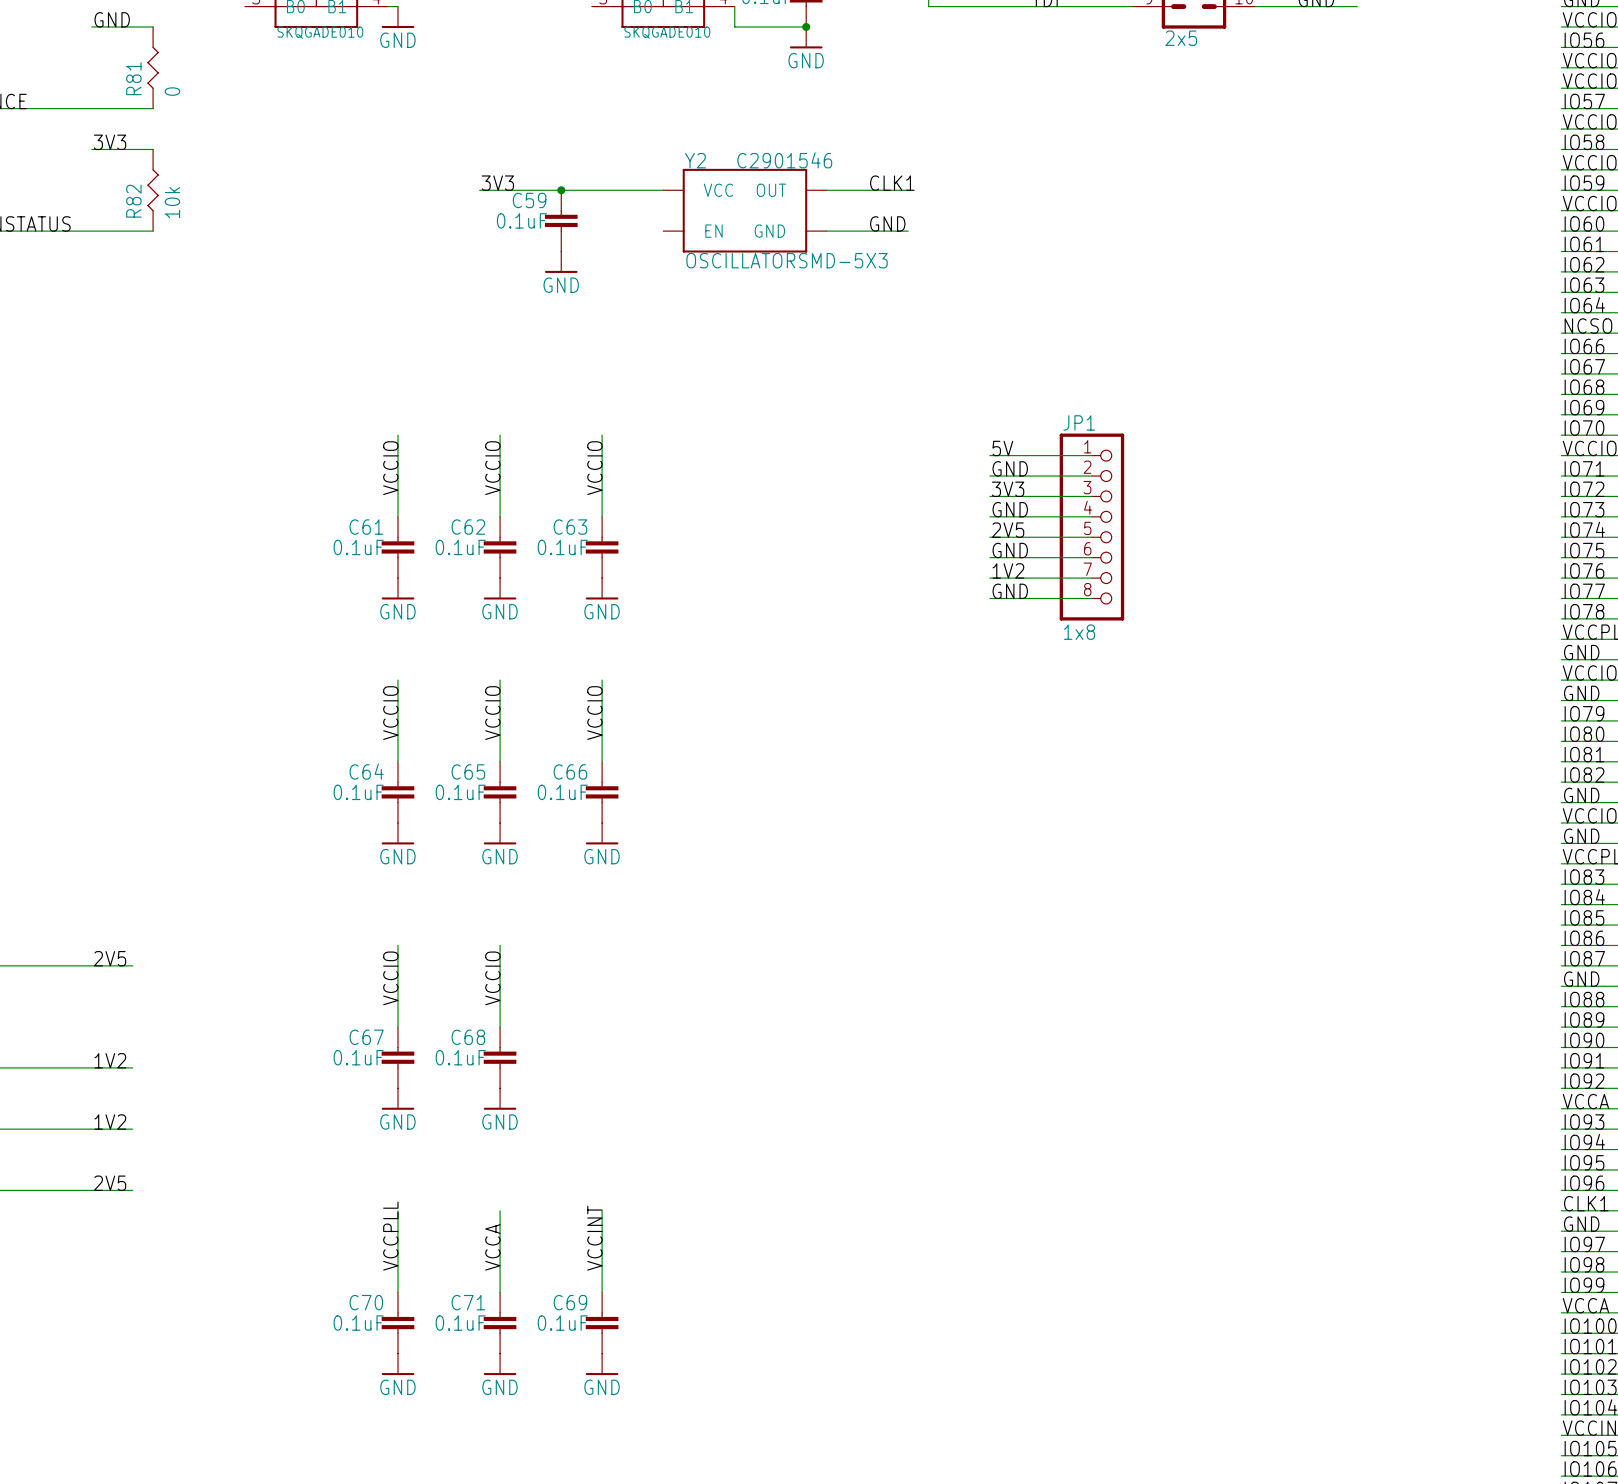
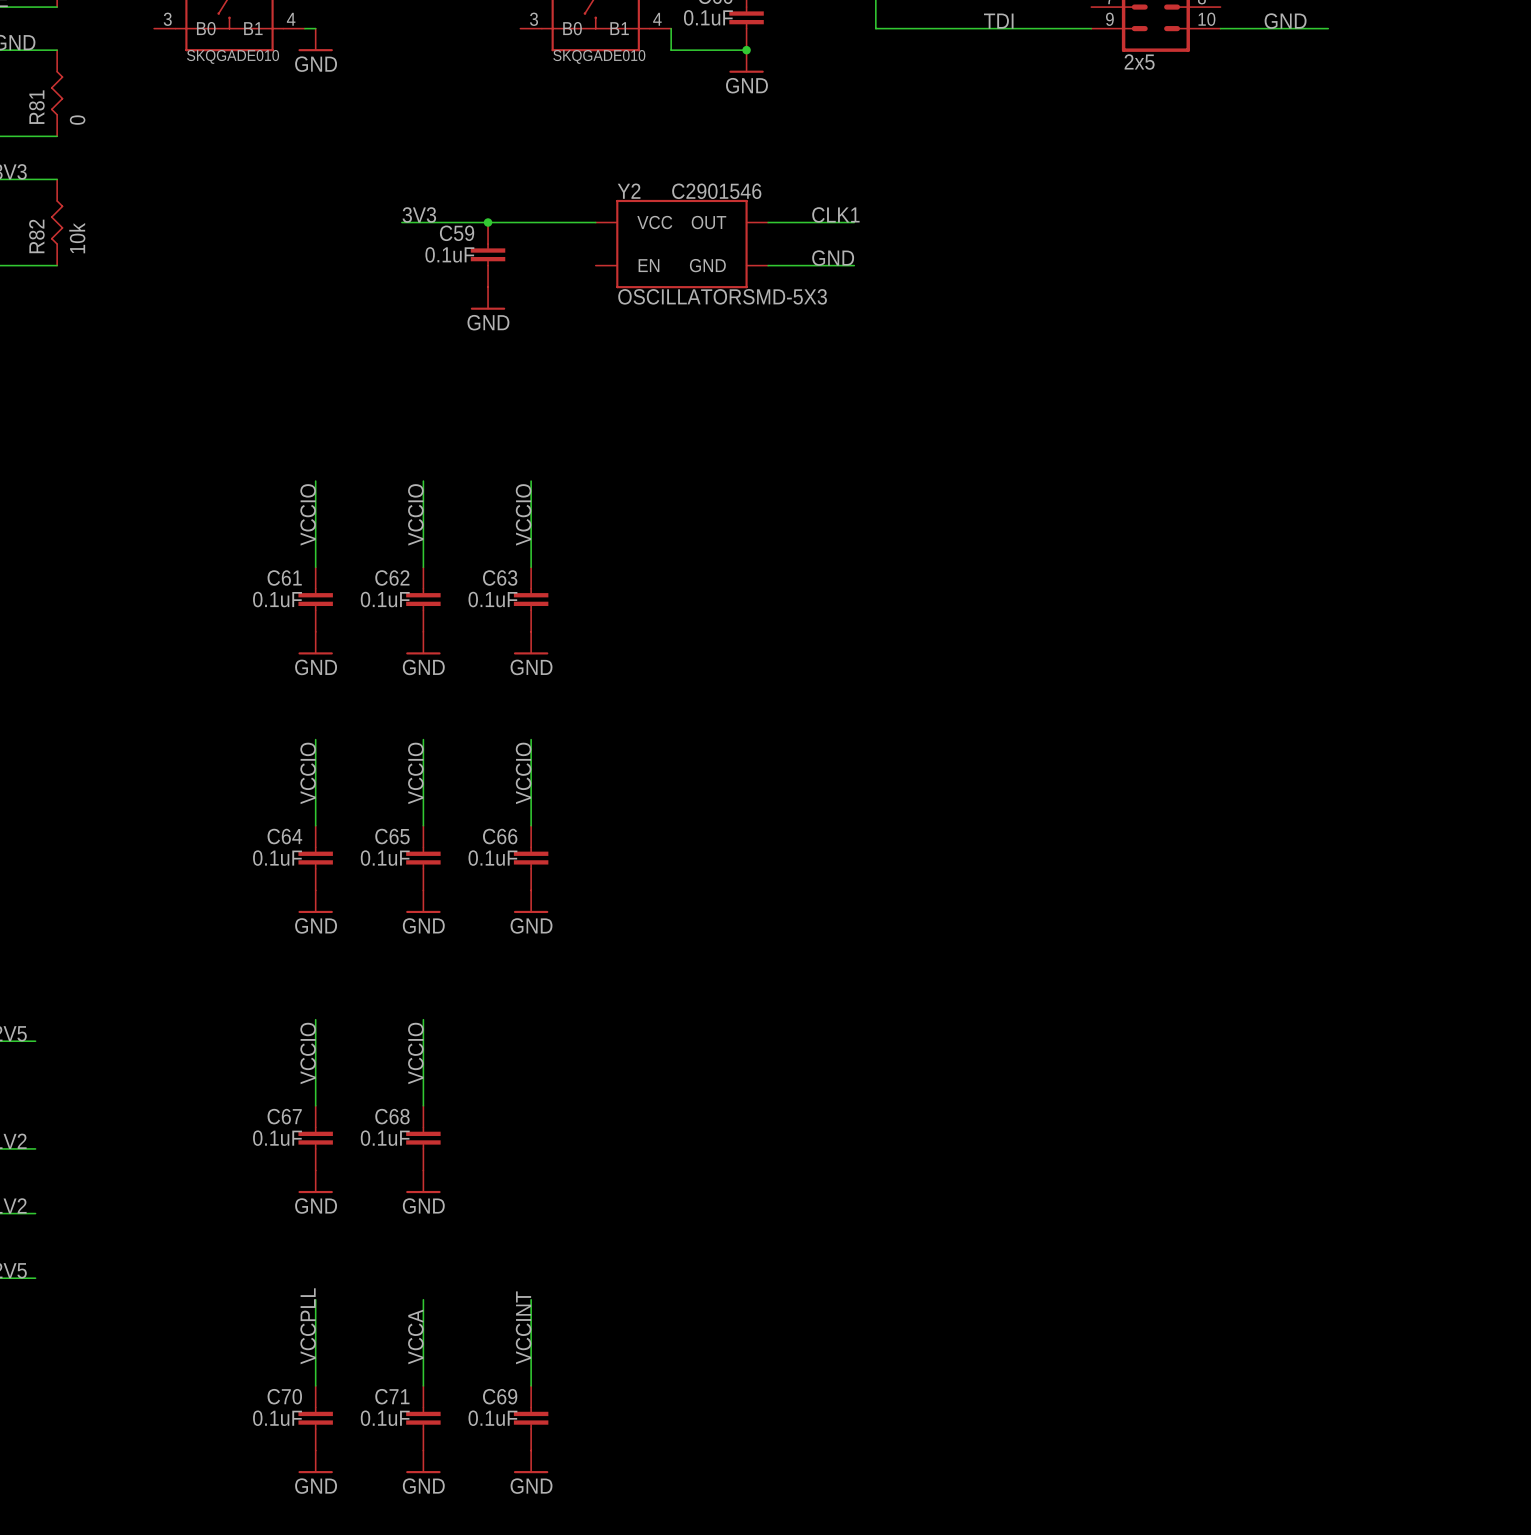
label: 5V (1002, 448) -> none
wire: (989, 455) (1091, 455) -> none
label: GND (1010, 468) -> none
wire: (989, 476) (1091, 476) -> none
label: 3V3 (1008, 489) -> none
wire: (989, 496) (1091, 496) -> none
label: GND (1010, 509) -> none
wire: (989, 516) (1091, 516) -> none
JP1: 1x8 (1091, 527) -> none
label: 2V5 (1008, 530) -> none
wire: (989, 537) (1091, 537) -> none
label: GND (1010, 550) -> none
wire: (989, 557) (1091, 557) -> none
label: 1V2 (1008, 570) -> none
wire: (989, 578) (1091, 578) -> none
label: GND (1010, 591) -> none
wire: (989, 598) (1091, 598) -> none

